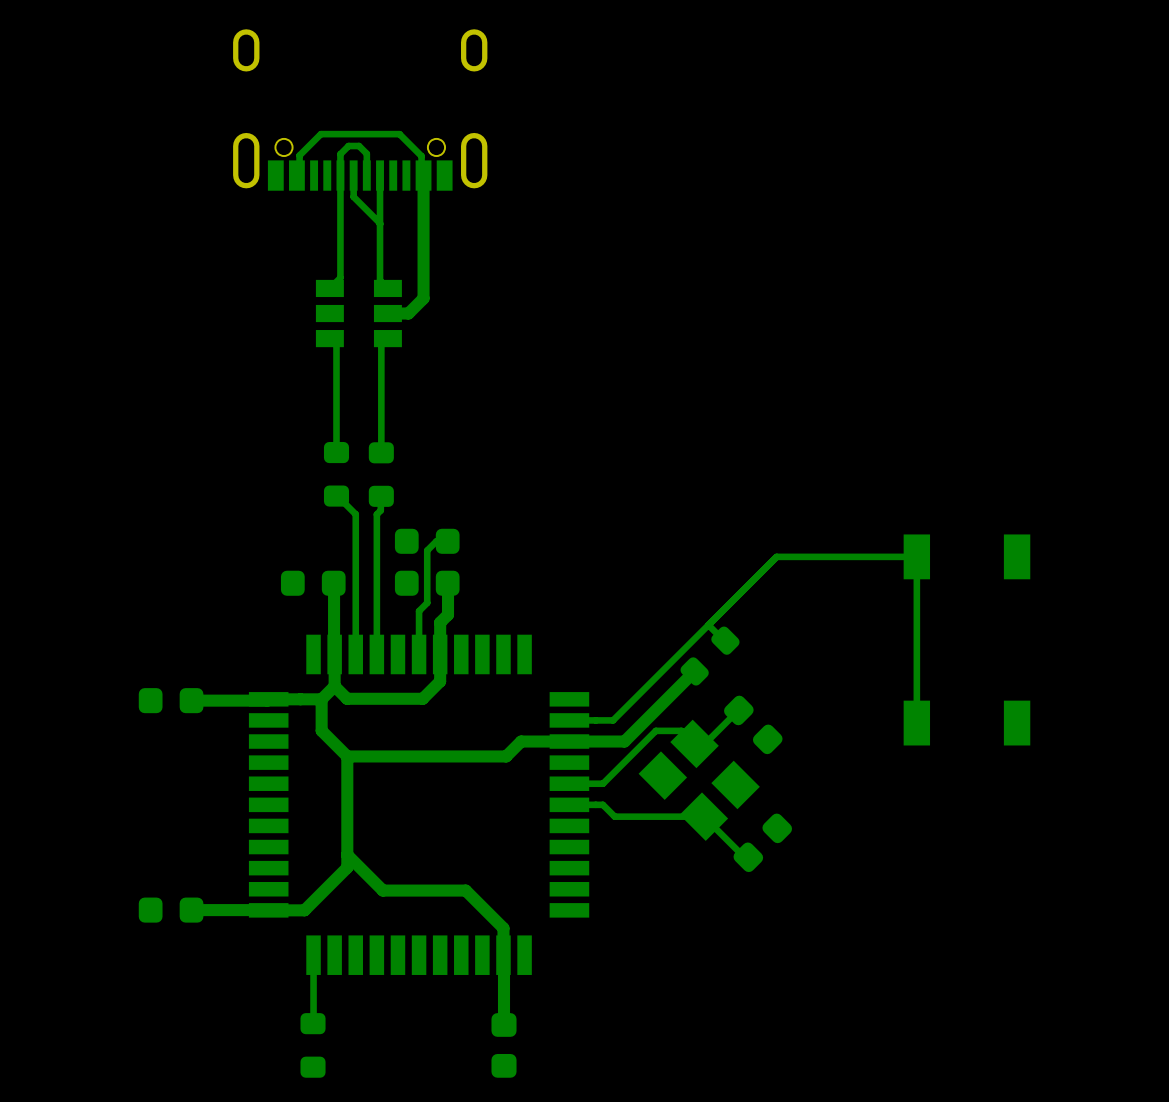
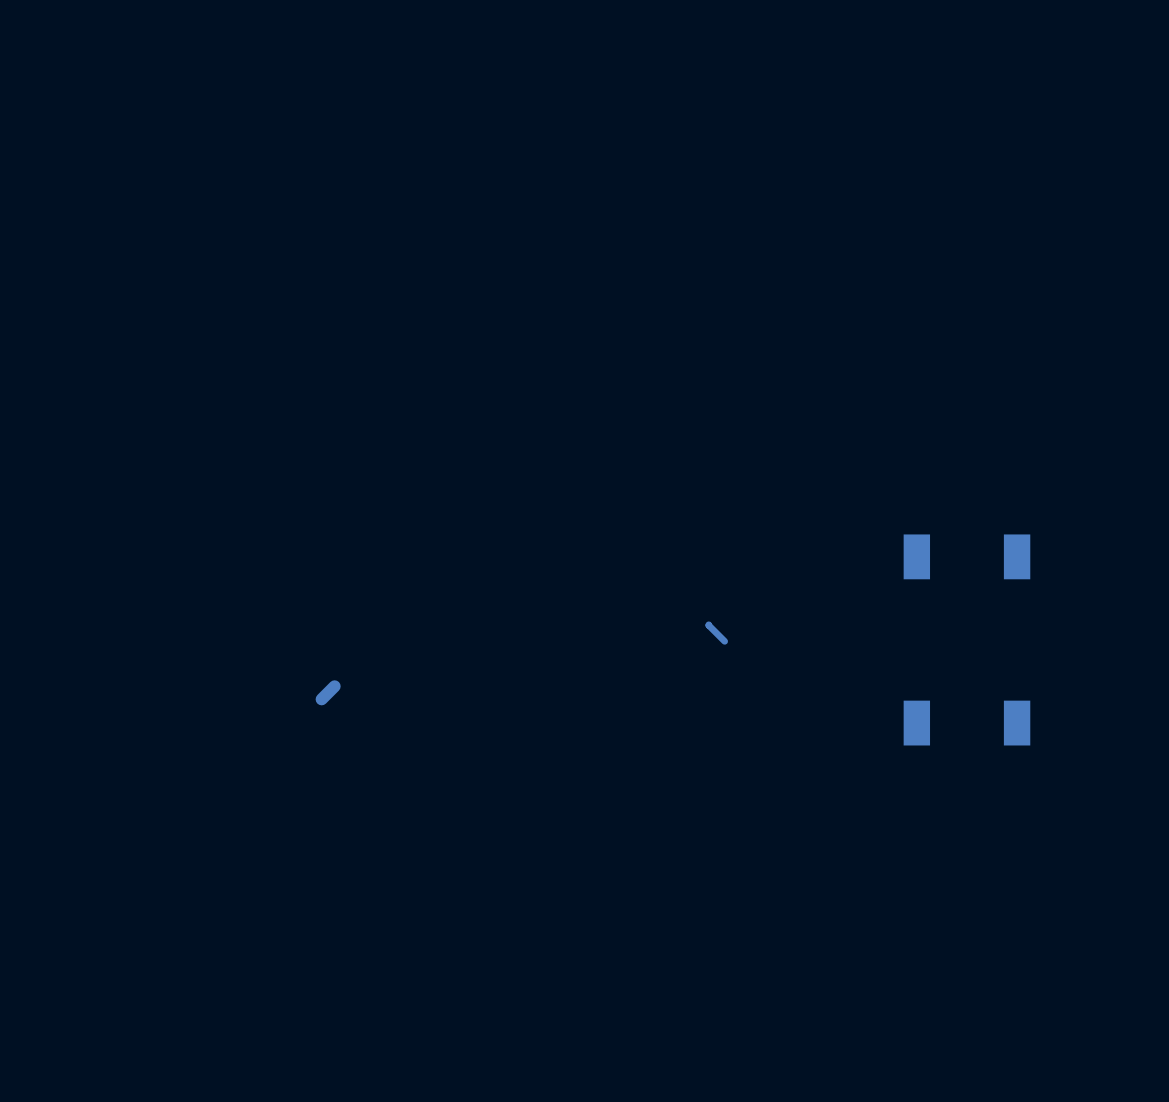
part: (360, 110) -> none
bottom track: (299, 168) (299, 155) (320, 134) (399, 134) (421, 156) (421, 173) -> none
bottom track: (353, 175) (353, 196) (380, 223) -> none
bottom track: (366, 175) (366, 153) (359, 146) (348, 146) (340, 154) (340, 277) (329, 288) -> none
bottom track: (380, 175) (380, 280) (387, 288) -> none
bottom track: (423, 177) (423, 298) (408, 313) (387, 313) -> none
part: (358, 313) -> none
bottom track: (329, 338) (336, 345) (336, 453) -> none
bottom track: (387, 338) (381, 345) (381, 453) -> none
part: (336, 474) -> none
part: (381, 474) -> none
bottom track: (336, 495) (355, 514) (355, 654) -> none
bottom track: (381, 495) (380, 510) (376, 514) (376, 654) -> none
part: (427, 541) -> none
bottom track: (448, 541) (436, 541) (427, 550) (427, 602) (419, 611) (419, 654) -> none
part: (313, 583) -> none
bottom track: (334, 583) (334, 686) (347, 698) (422, 698) (440, 681) (440, 622) (448, 614) (448, 583) (444, 586) -> none
part: (427, 583) -> none
part: (710, 656) -> none
bottom track: (695, 670) (624, 741) (521, 741) (506, 756) (347, 756) -> none
part: (171, 700) -> none
bottom track: (191, 700) (321, 699) (321, 730) (347, 756) -> none
bottom track: (738, 710) (704, 743) (694, 743) (681, 730) (655, 730) (603, 783) (569, 783) -> none
bottom track: (569, 720) (613, 720) (776, 556) (916, 556) (916, 723) -> none
part: (753, 724) -> none
bottom track: (347, 756) (347, 867) (304, 910) (268, 910) -> none
part: (699, 780) -> none
part: (419, 804) -> none
bottom track: (569, 804) (602, 804) (614, 816) (703, 816) (744, 857) (748, 857) -> none
part: (762, 842) -> none
bottom track: (347, 854) (382, 890) (465, 890) (503, 928) (504, 1024) -> none
part: (171, 910) -> none
bottom track: (191, 910) (268, 910) -> none
bottom track: (313, 955) (313, 1024) -> none
part: (313, 1045) -> none
part: (504, 1045) -> none

